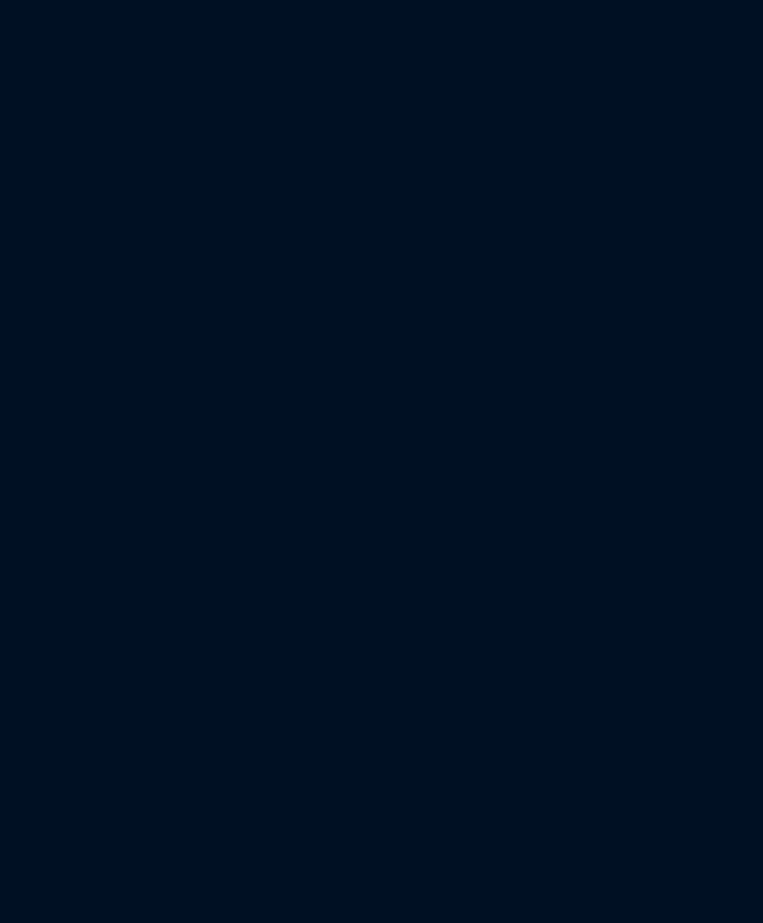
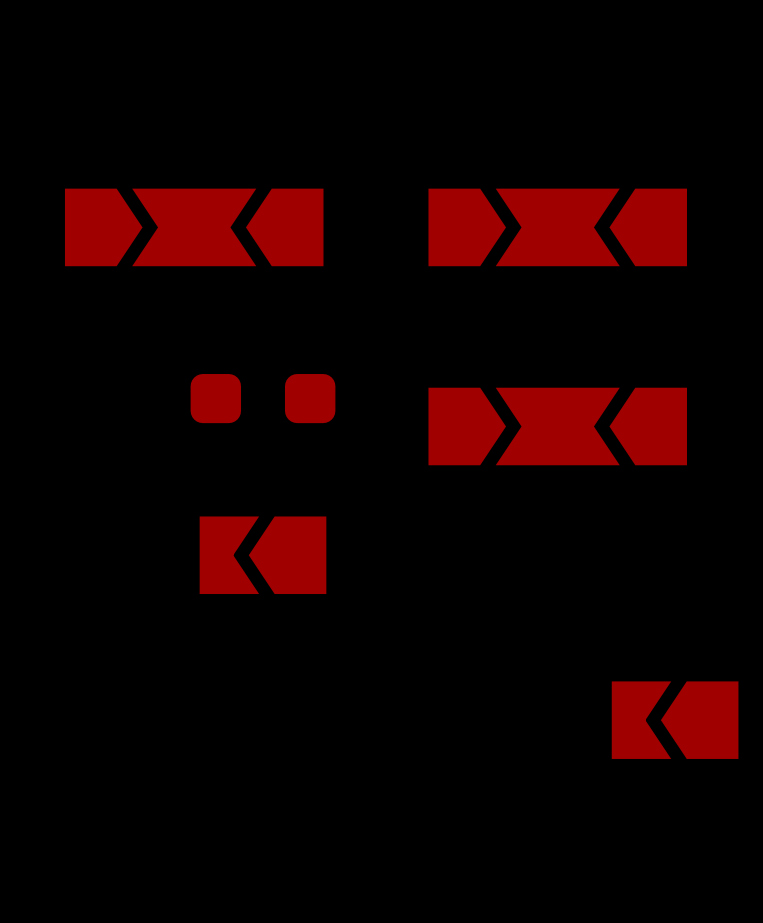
part: none -> (194, 227)
part: none -> (557, 227)
part: none -> (263, 398)
part: none -> (557, 426)
part: none -> (263, 555)
part: none -> (675, 720)

